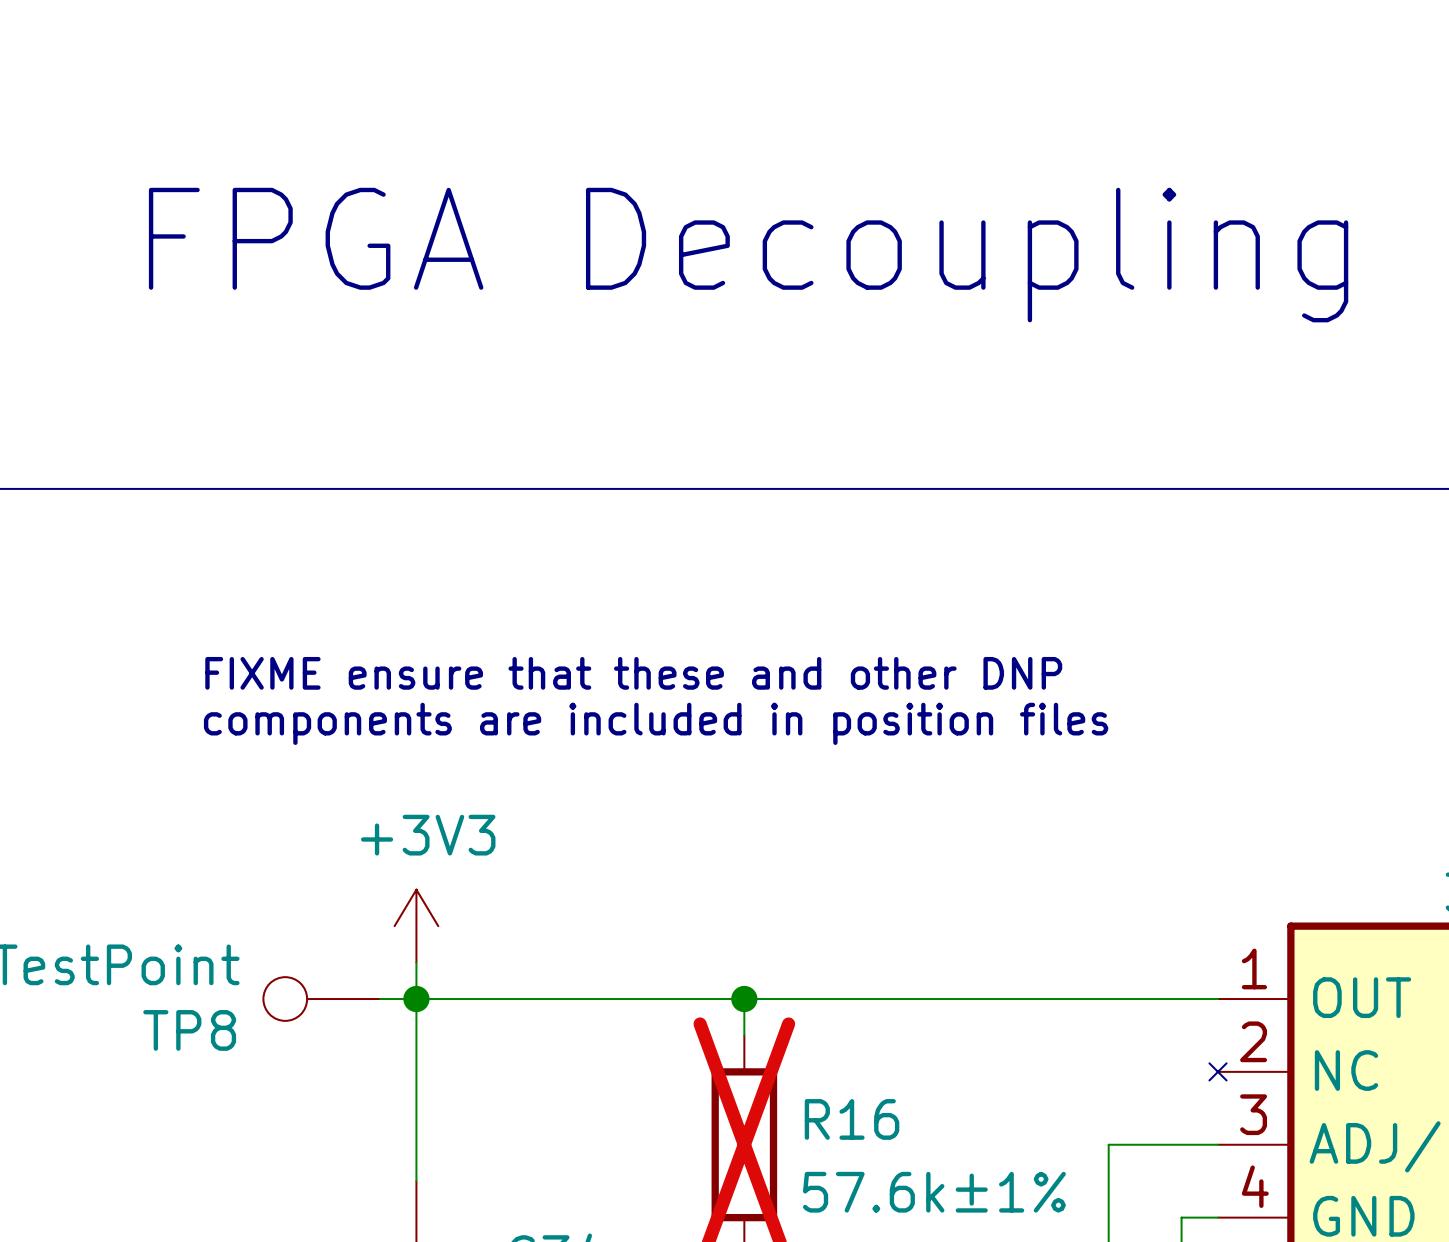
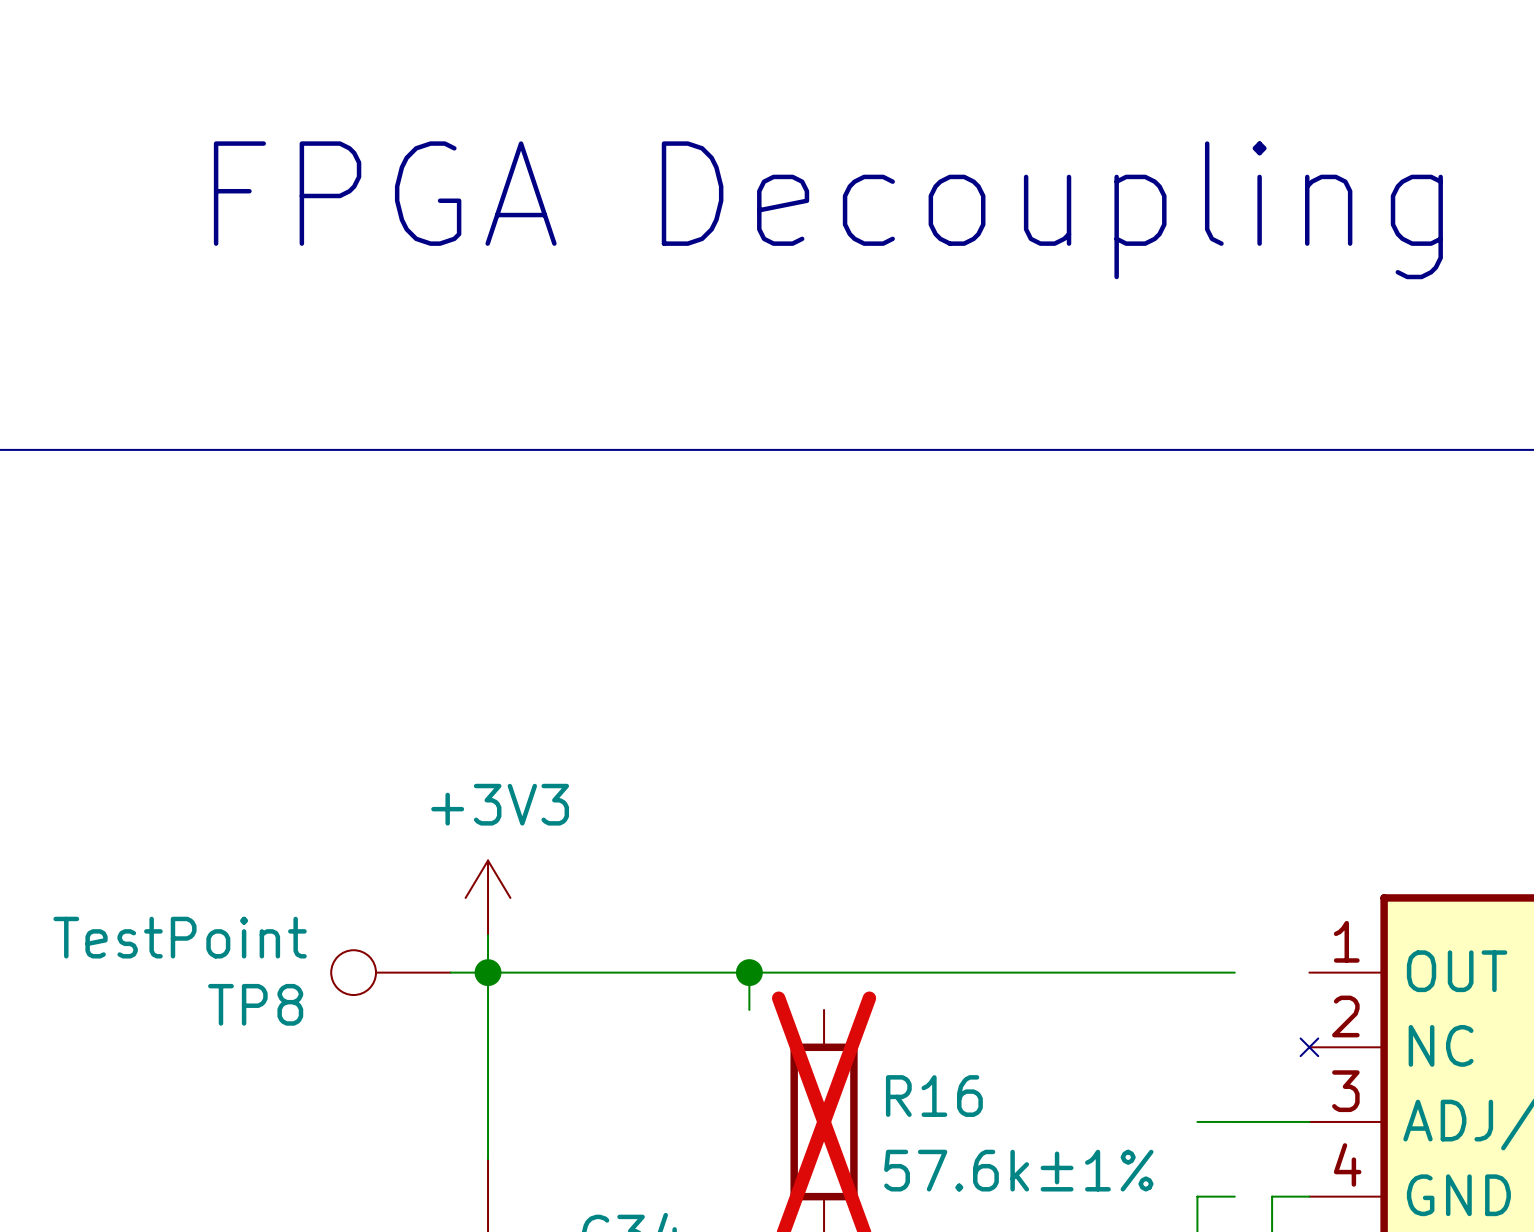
text: FIXME ensure that these and other DNP (633, 673) -> none
text: components are included in position files (656, 723) -> none
wire: (744, 999) (744, 1035) -> (749, 972) (749, 1009)
junction position: (744, 999) -> (749, 972)
wire: (1145, 999) (1218, 999) -> none
wire: (1108, 1144) (1108, 1217) -> (1234, 1196) (1197, 1196)

